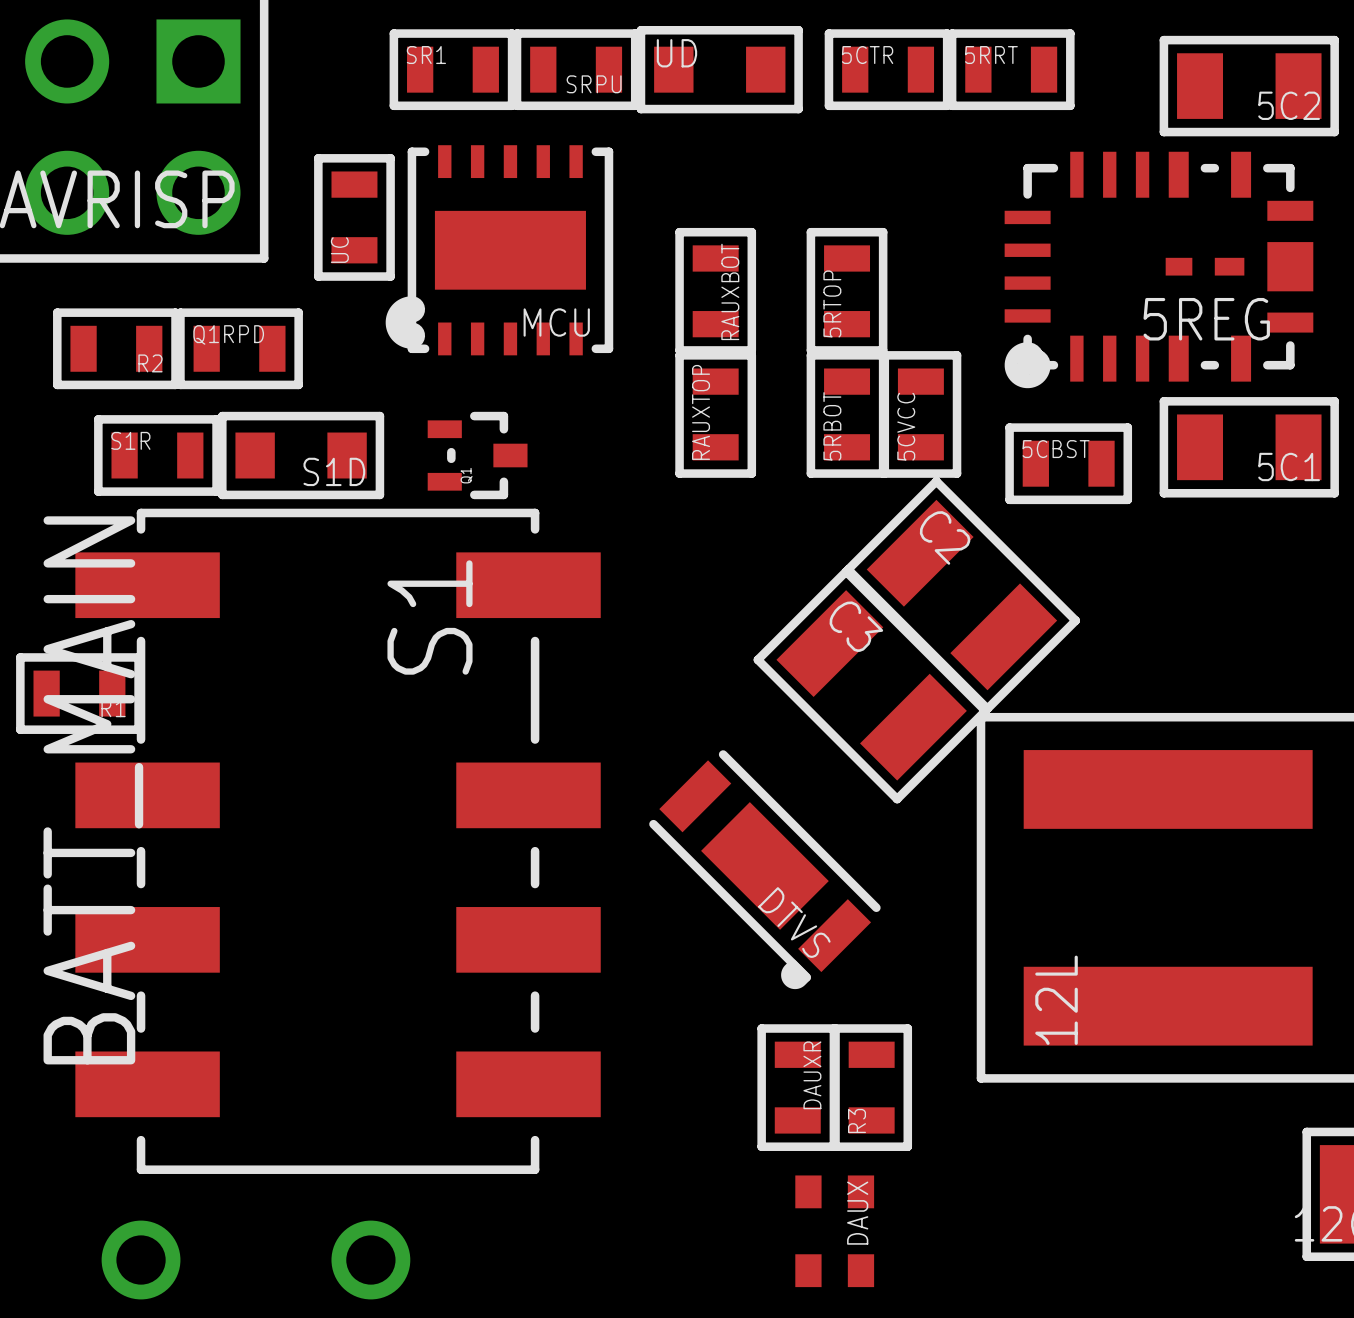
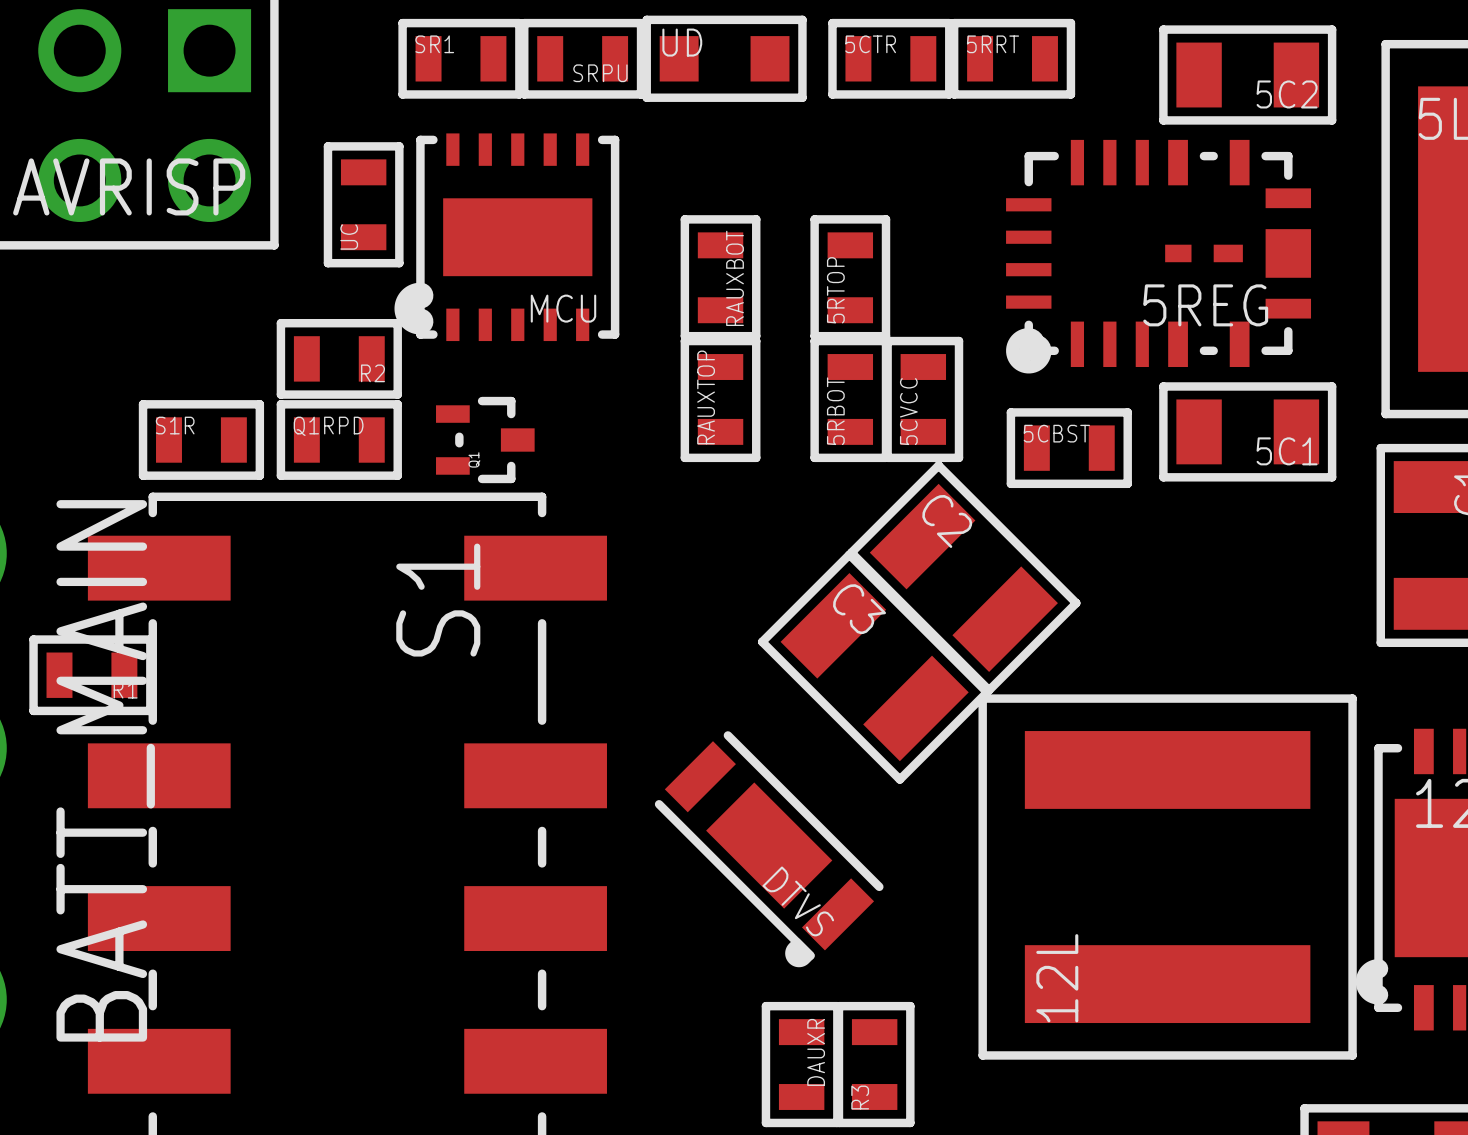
R2 position: (116, 348) -> (339, 358)
Q1RPD position: (239, 348) -> (339, 440)
S1R position: (157, 455) -> (201, 440)
S1D: (301, 455) -> none

